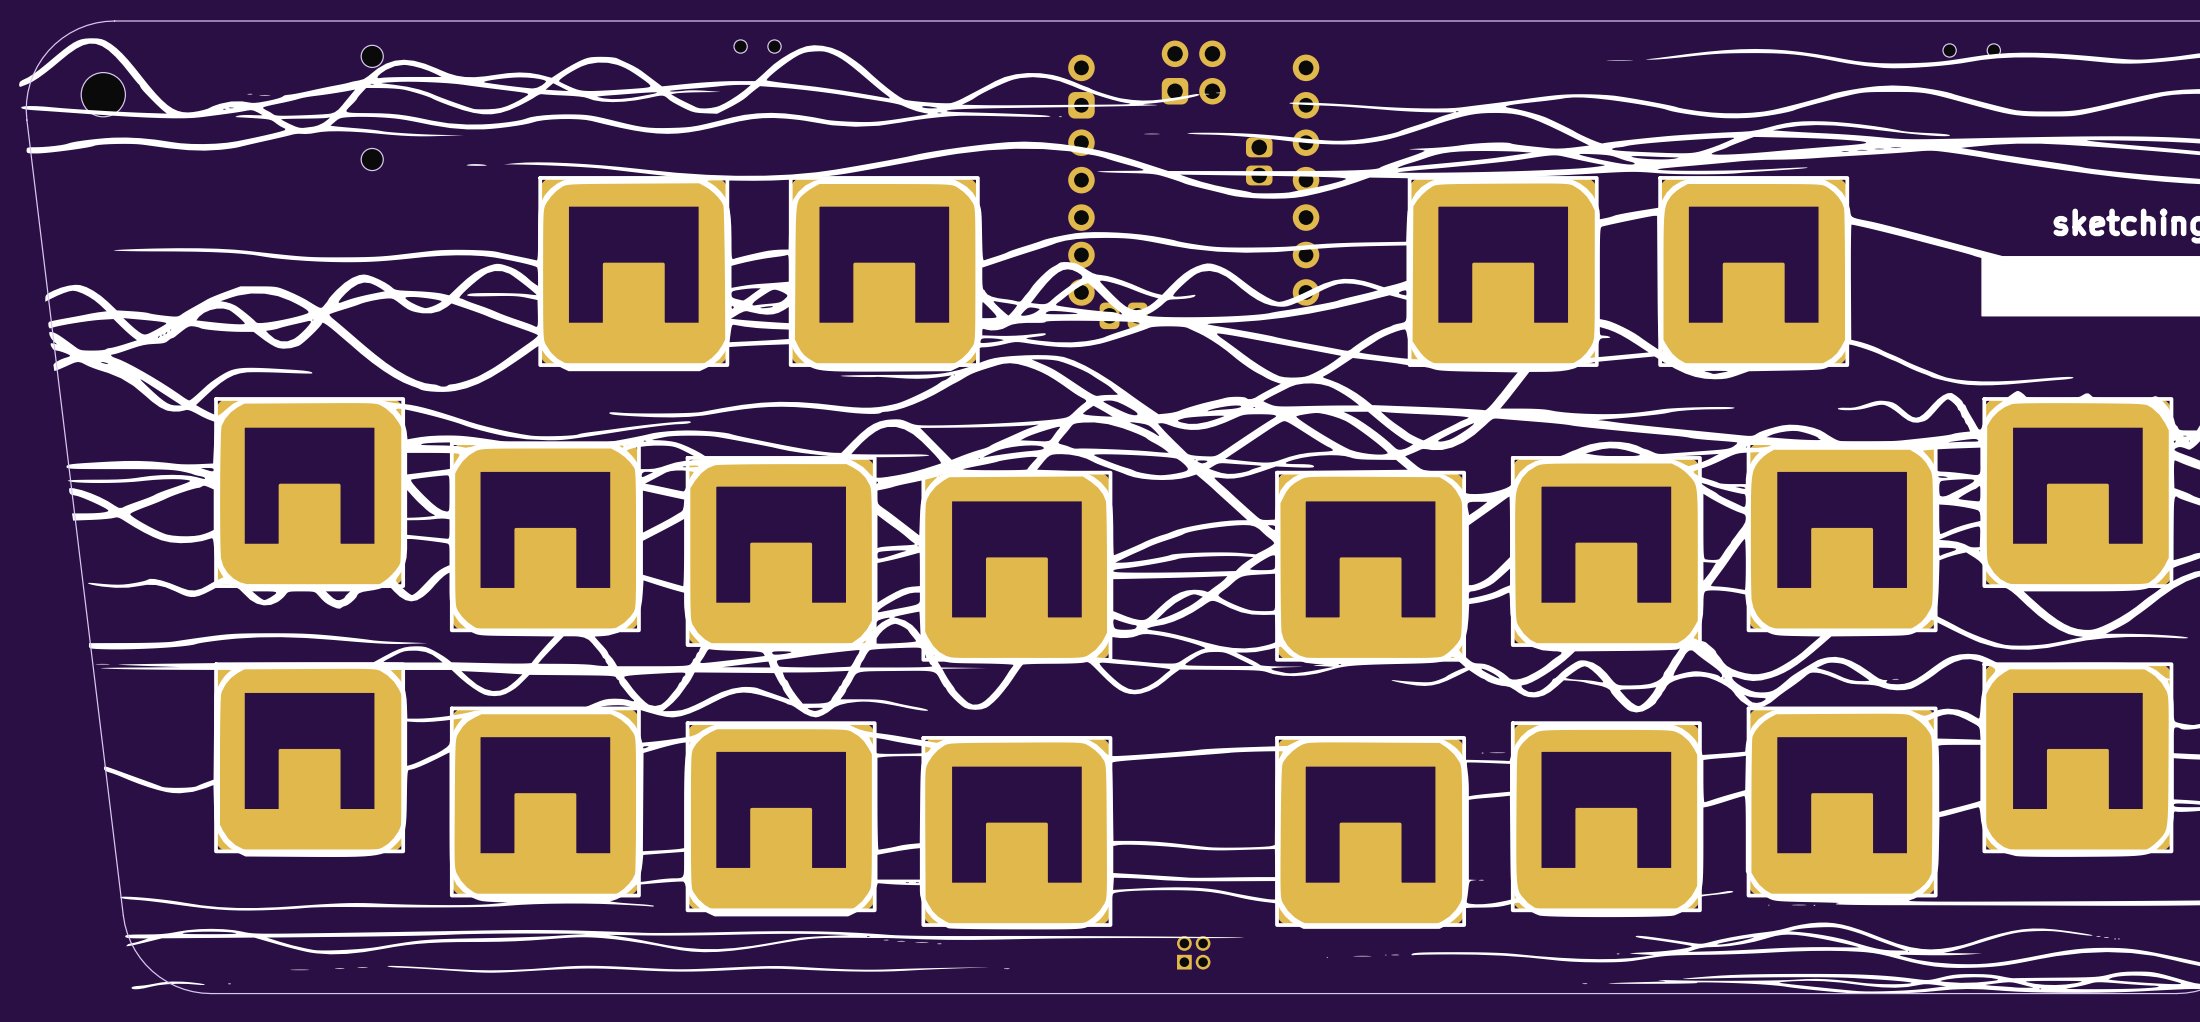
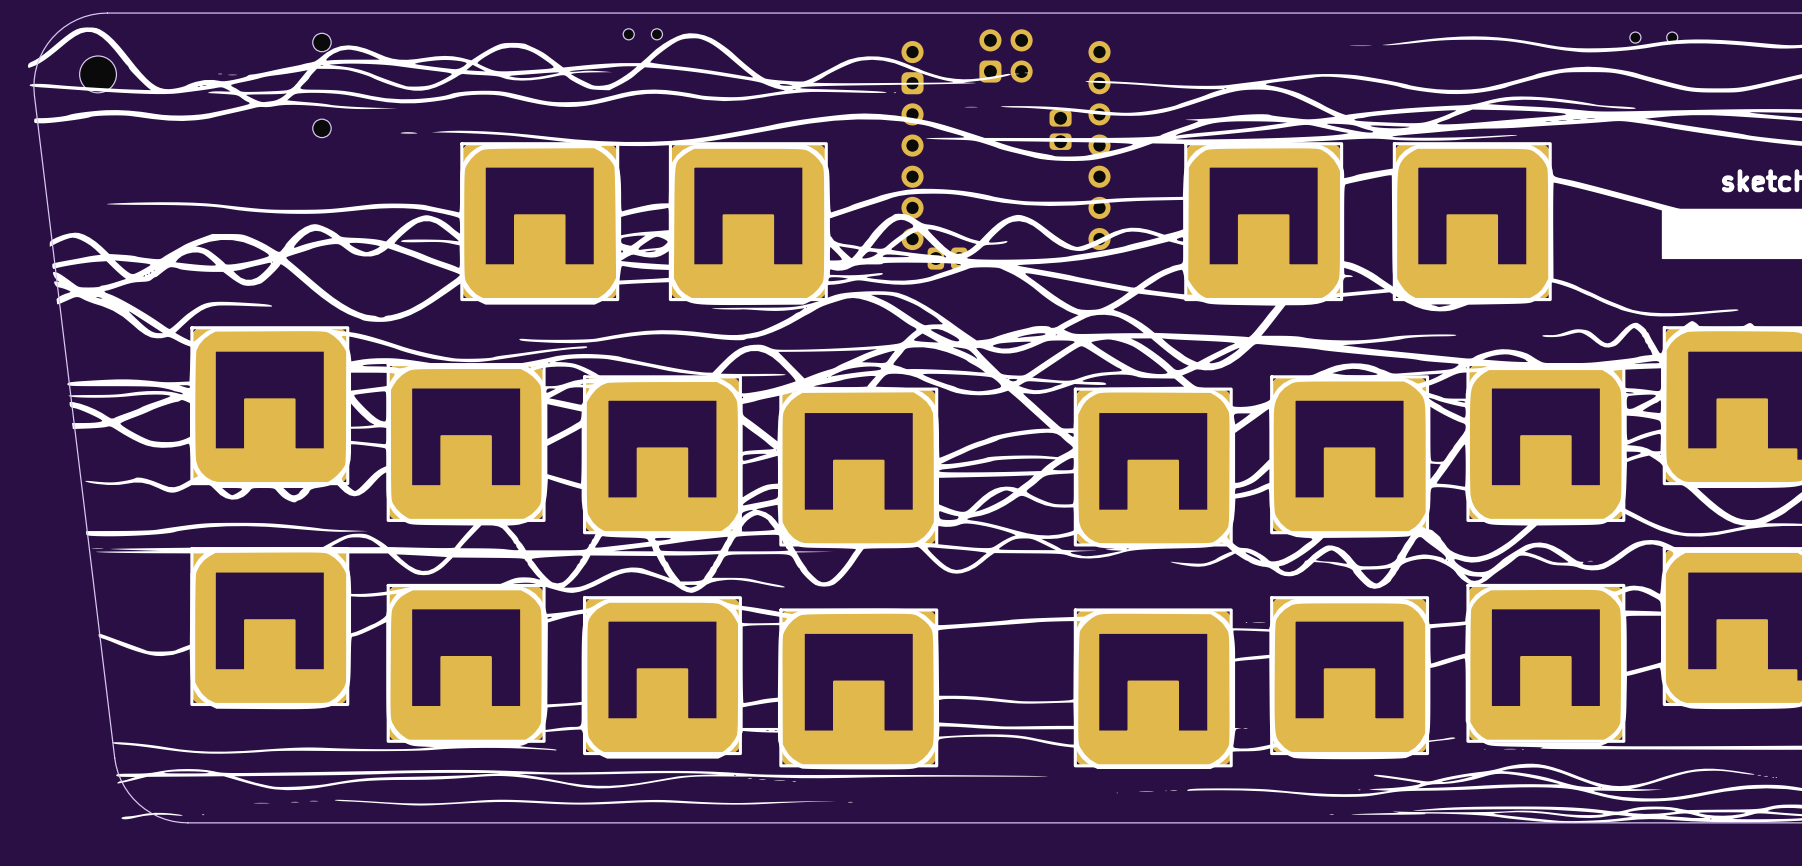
part: (1193, 952) -> none

